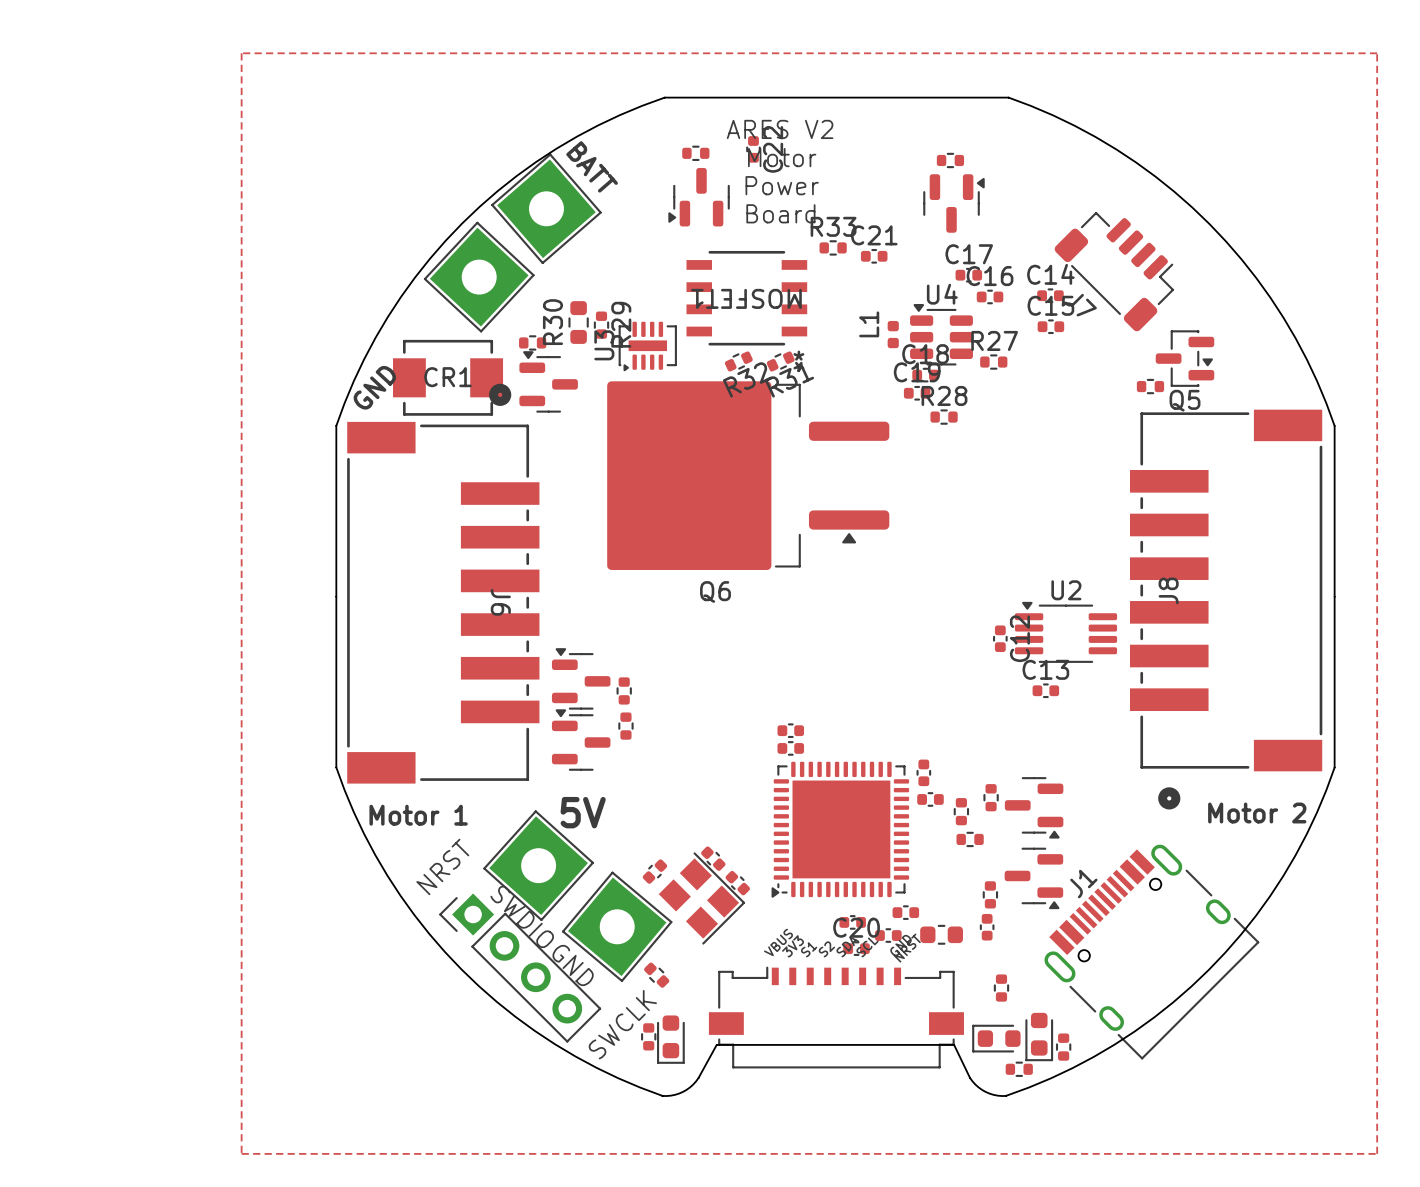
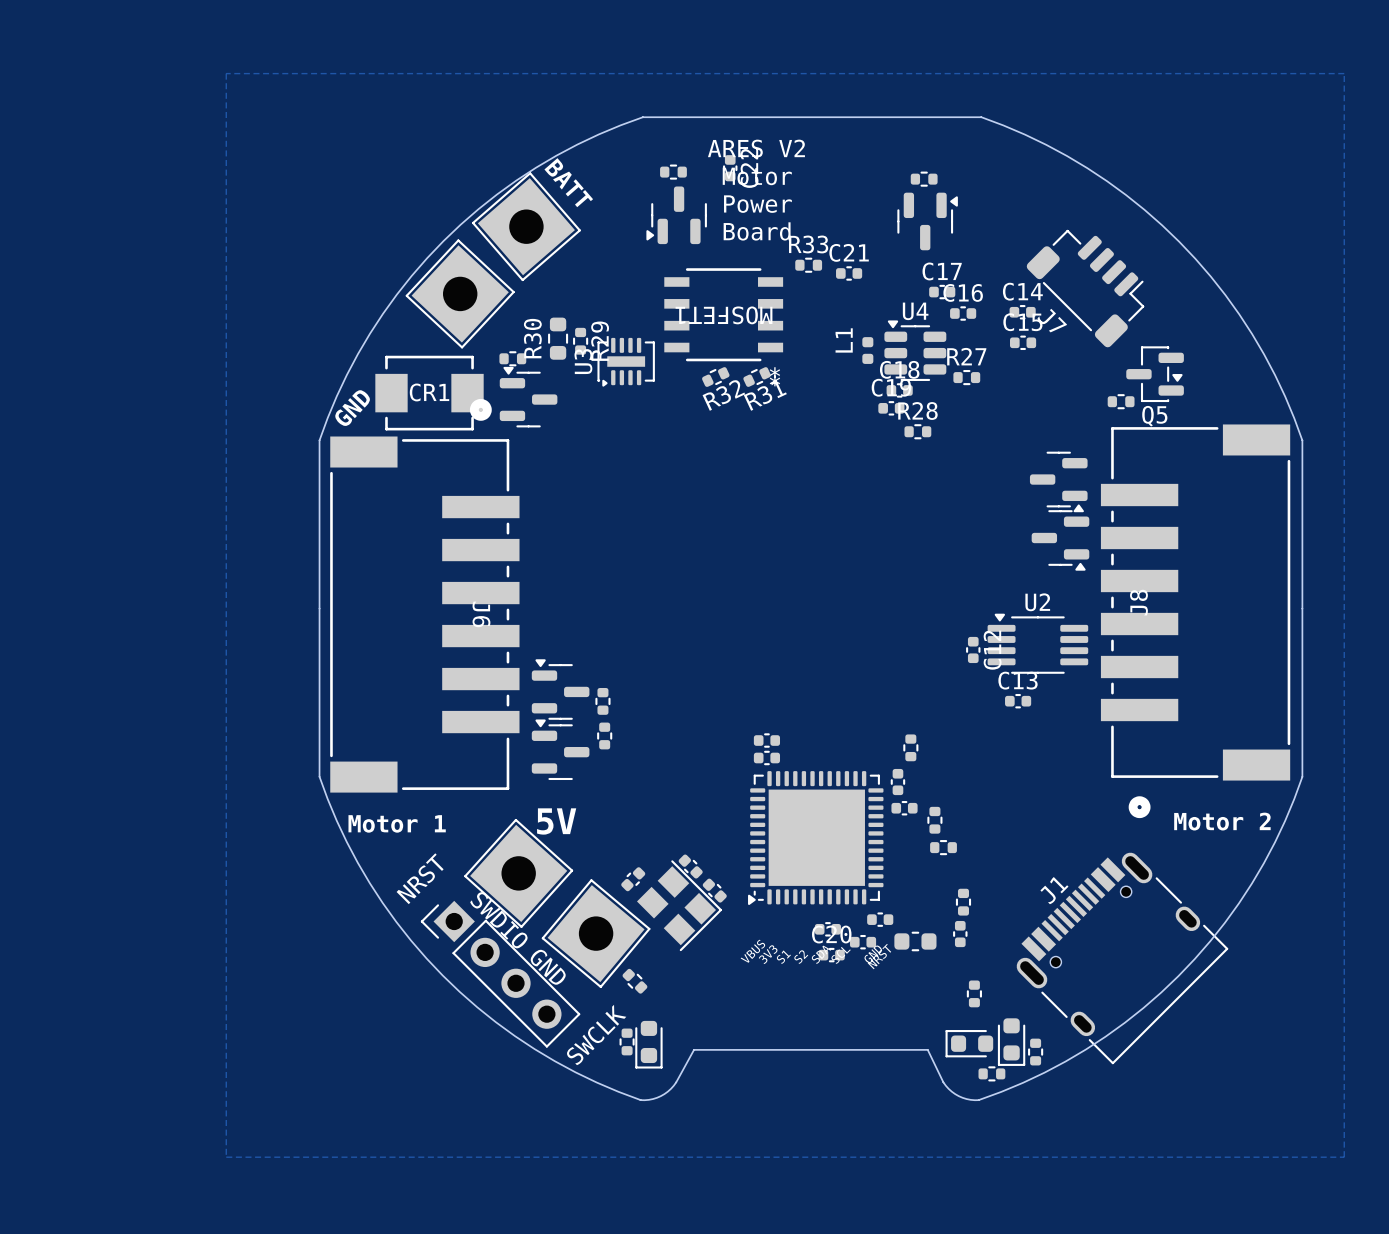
part: none -> (1058, 481)
Q6: (748, 475) -> none
part: none -> (1060, 540)
part position: (991, 797) -> (910, 747)
part: (1034, 807) -> none
part: (1033, 878) -> none
part: (836, 1017) -> none

